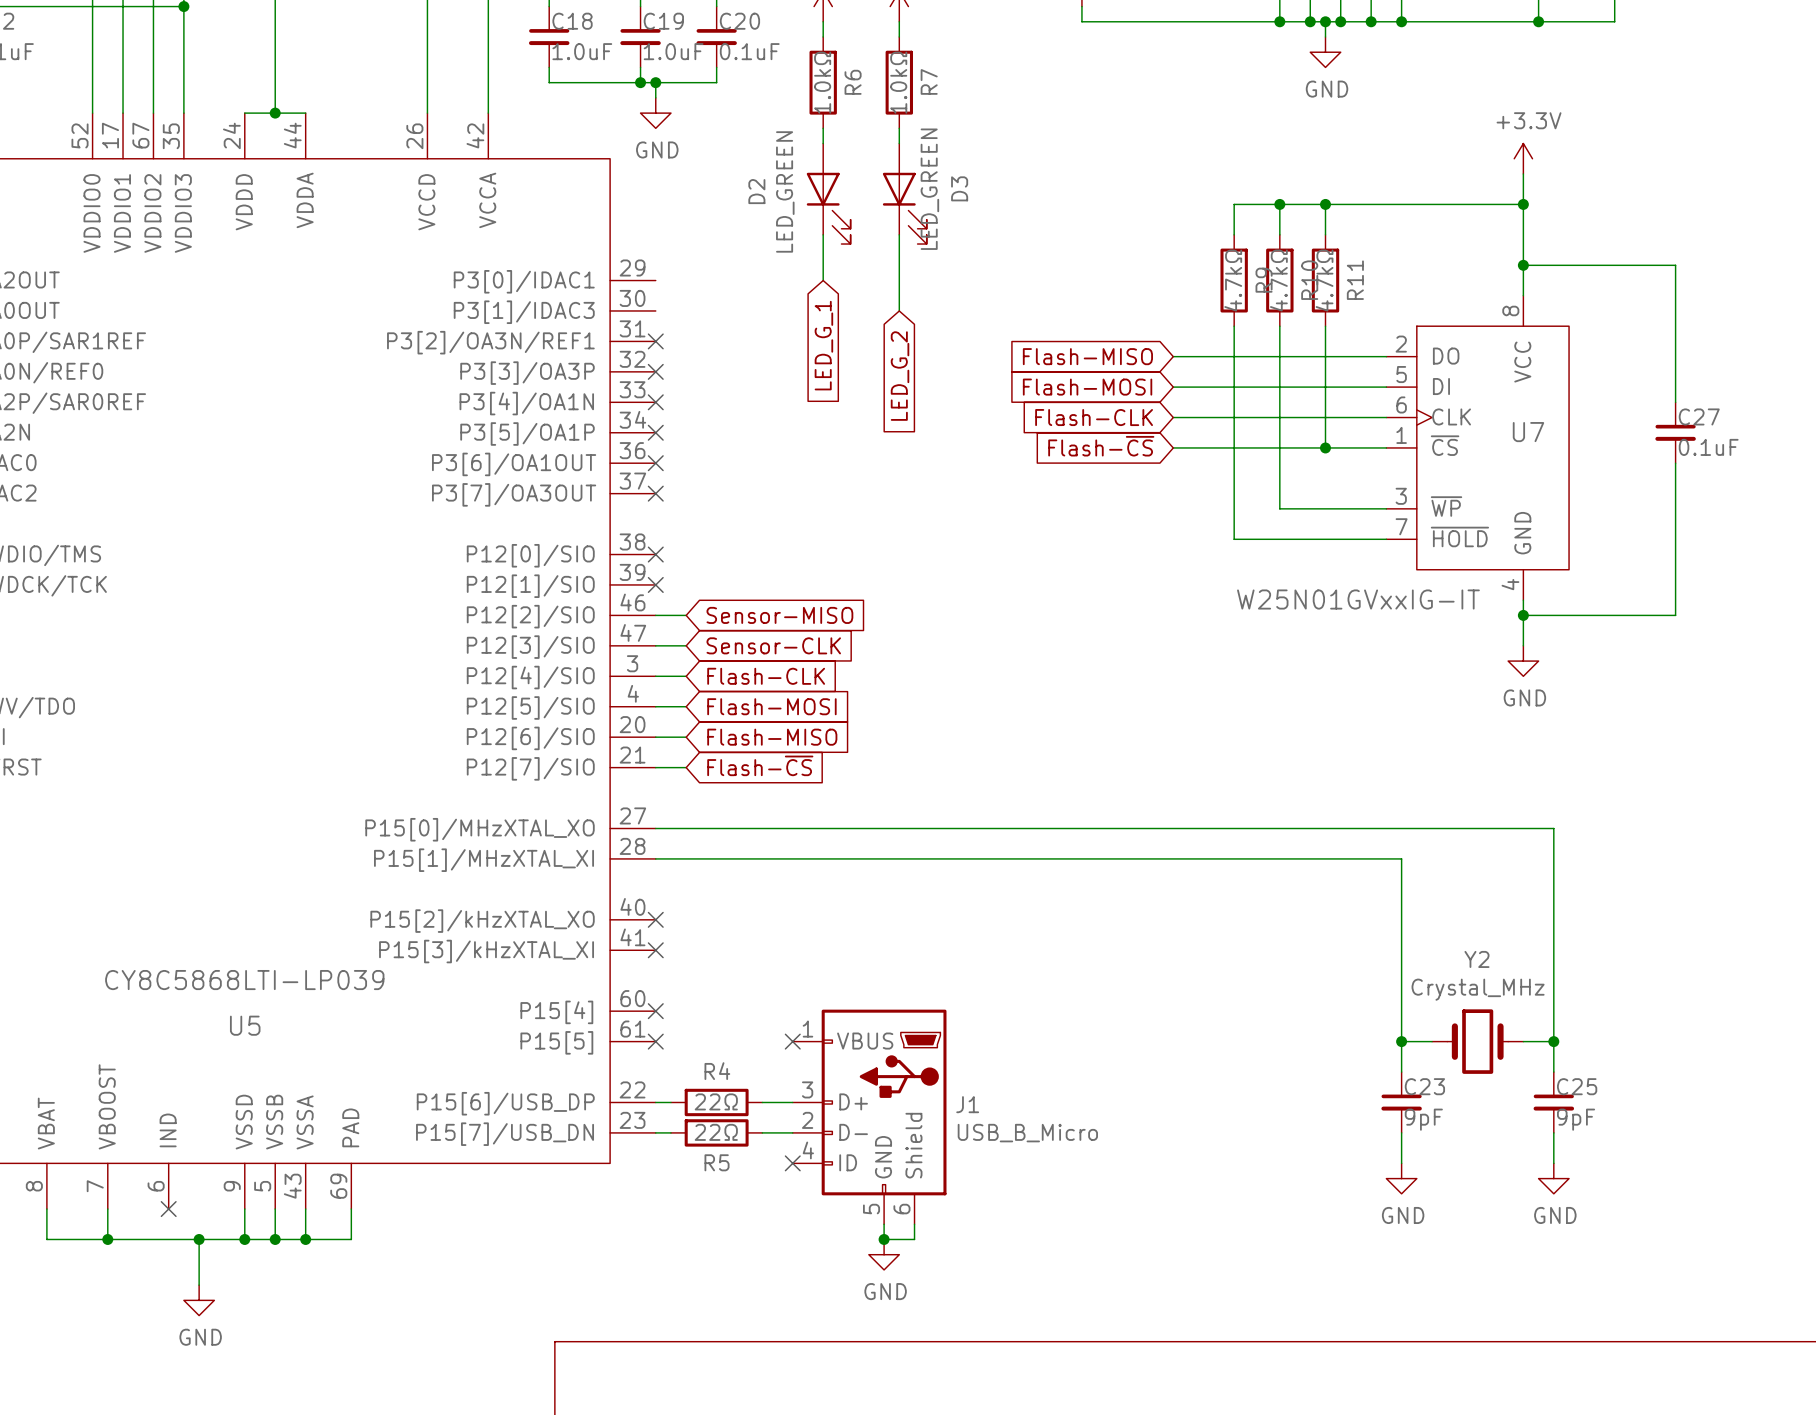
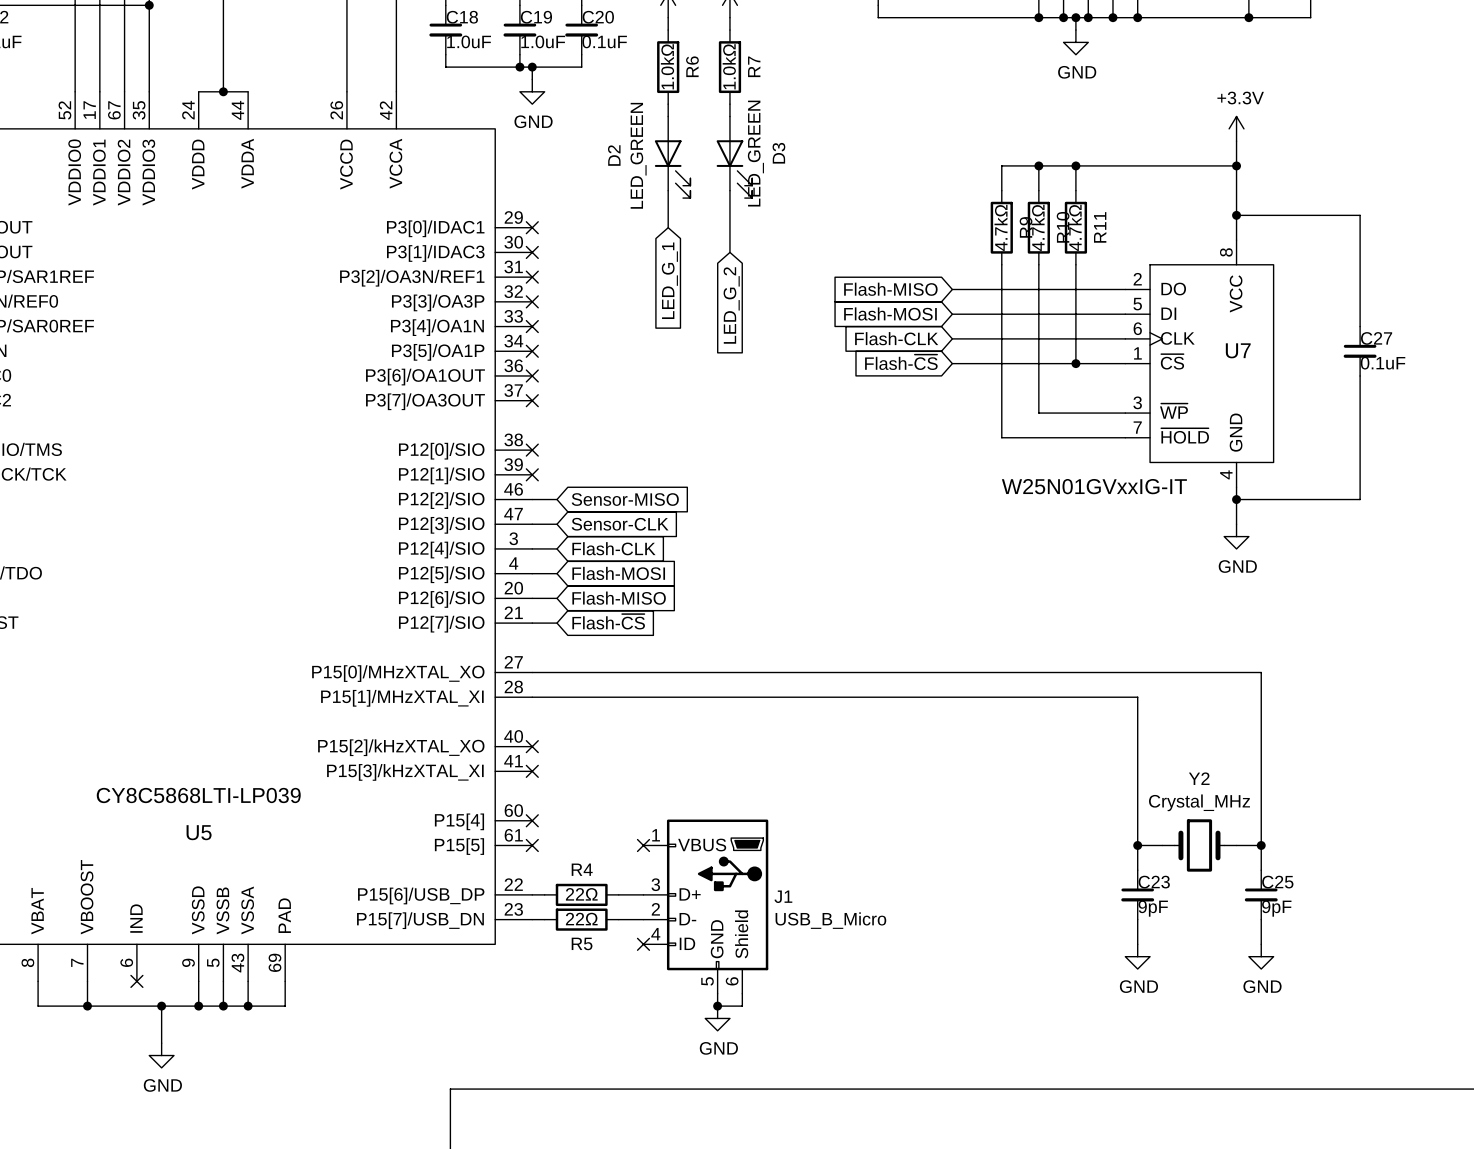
no-connect mark: none -> (532, 227)
no-connect mark: none -> (532, 252)

